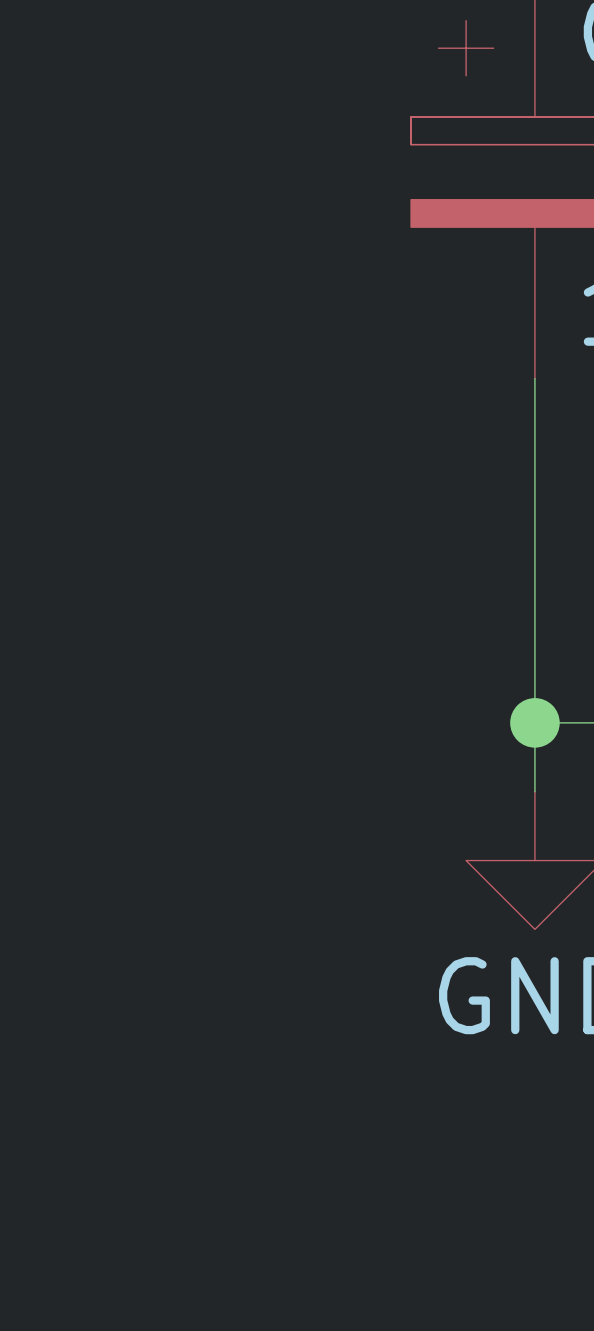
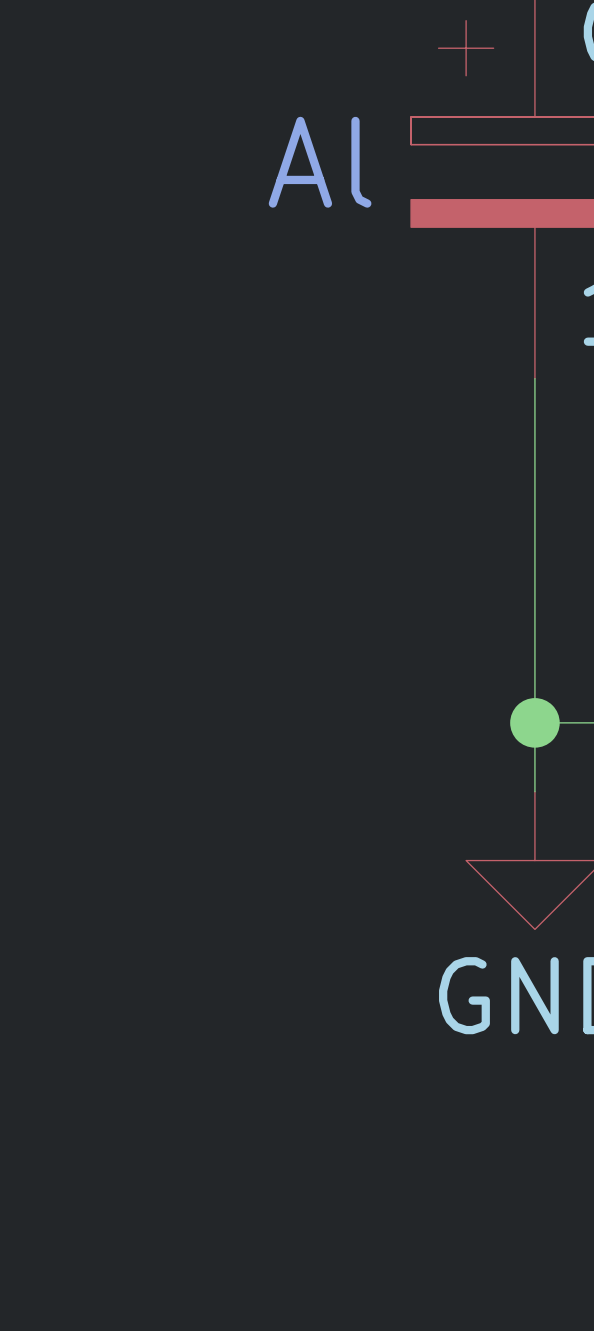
text: none -> Al (320, 162)

